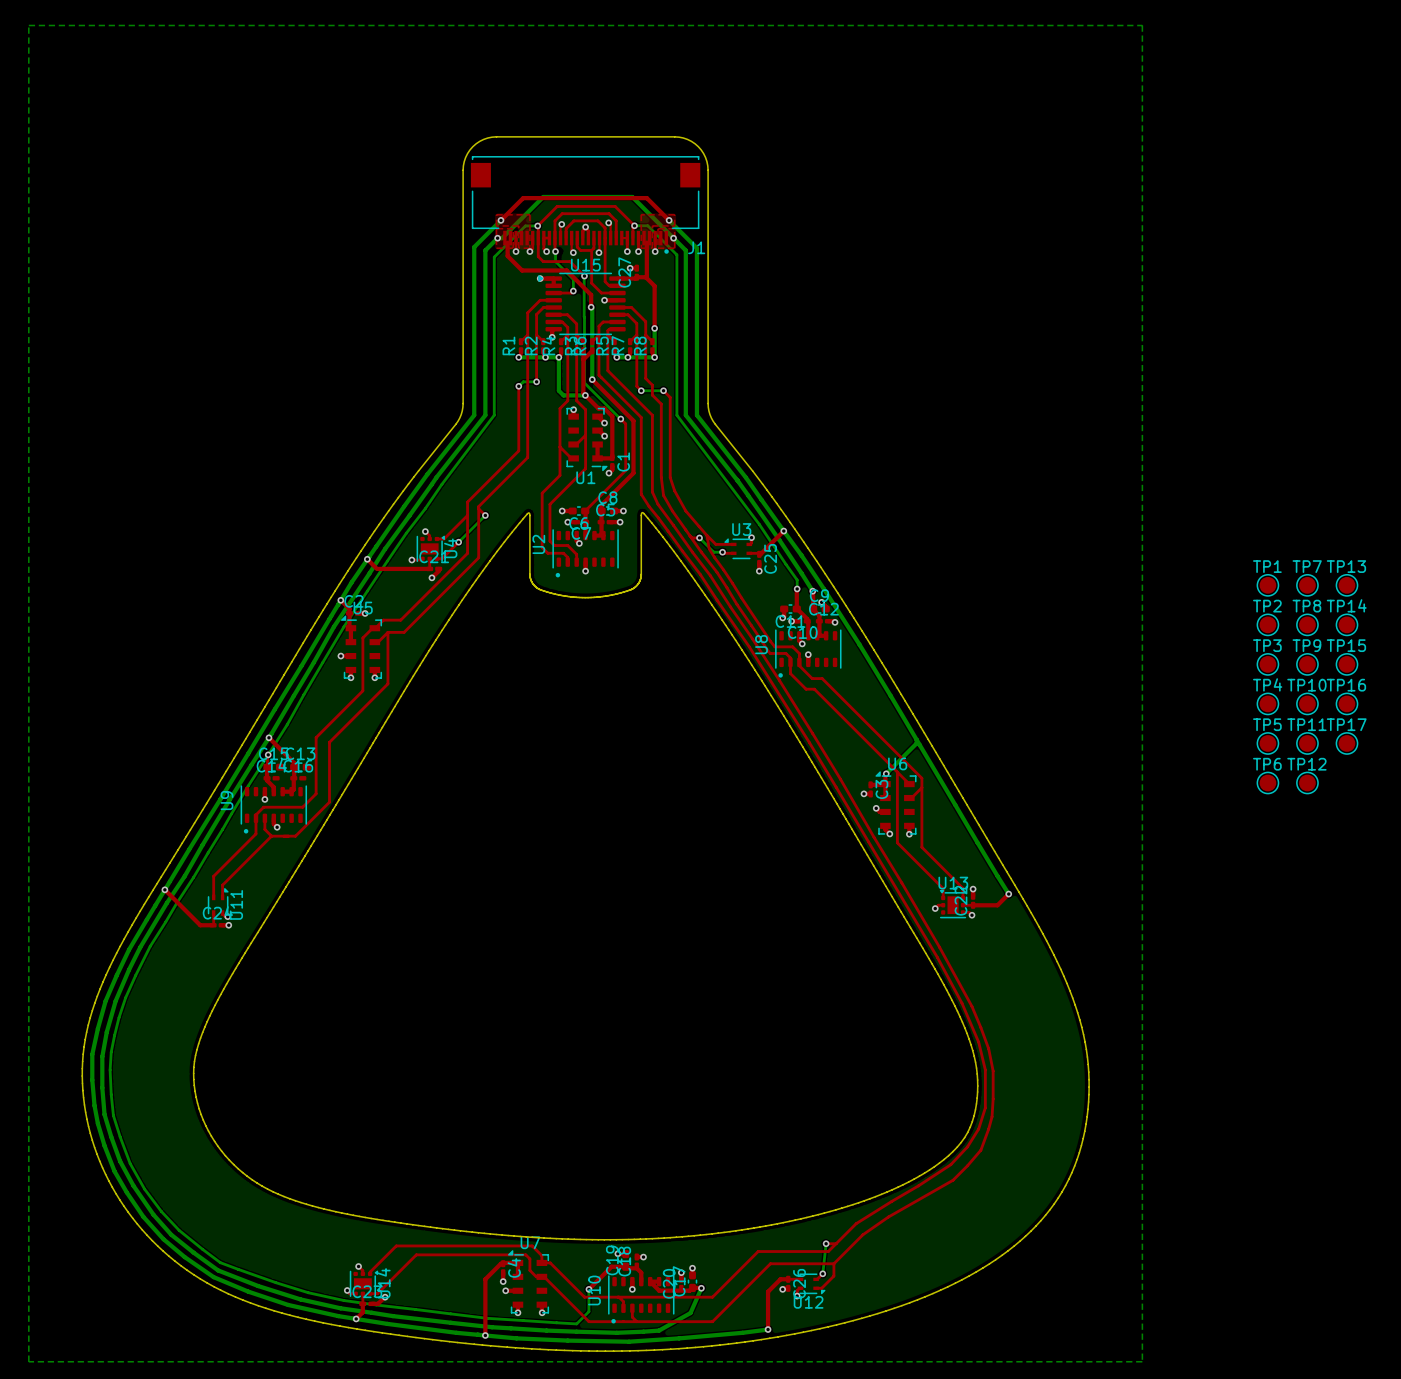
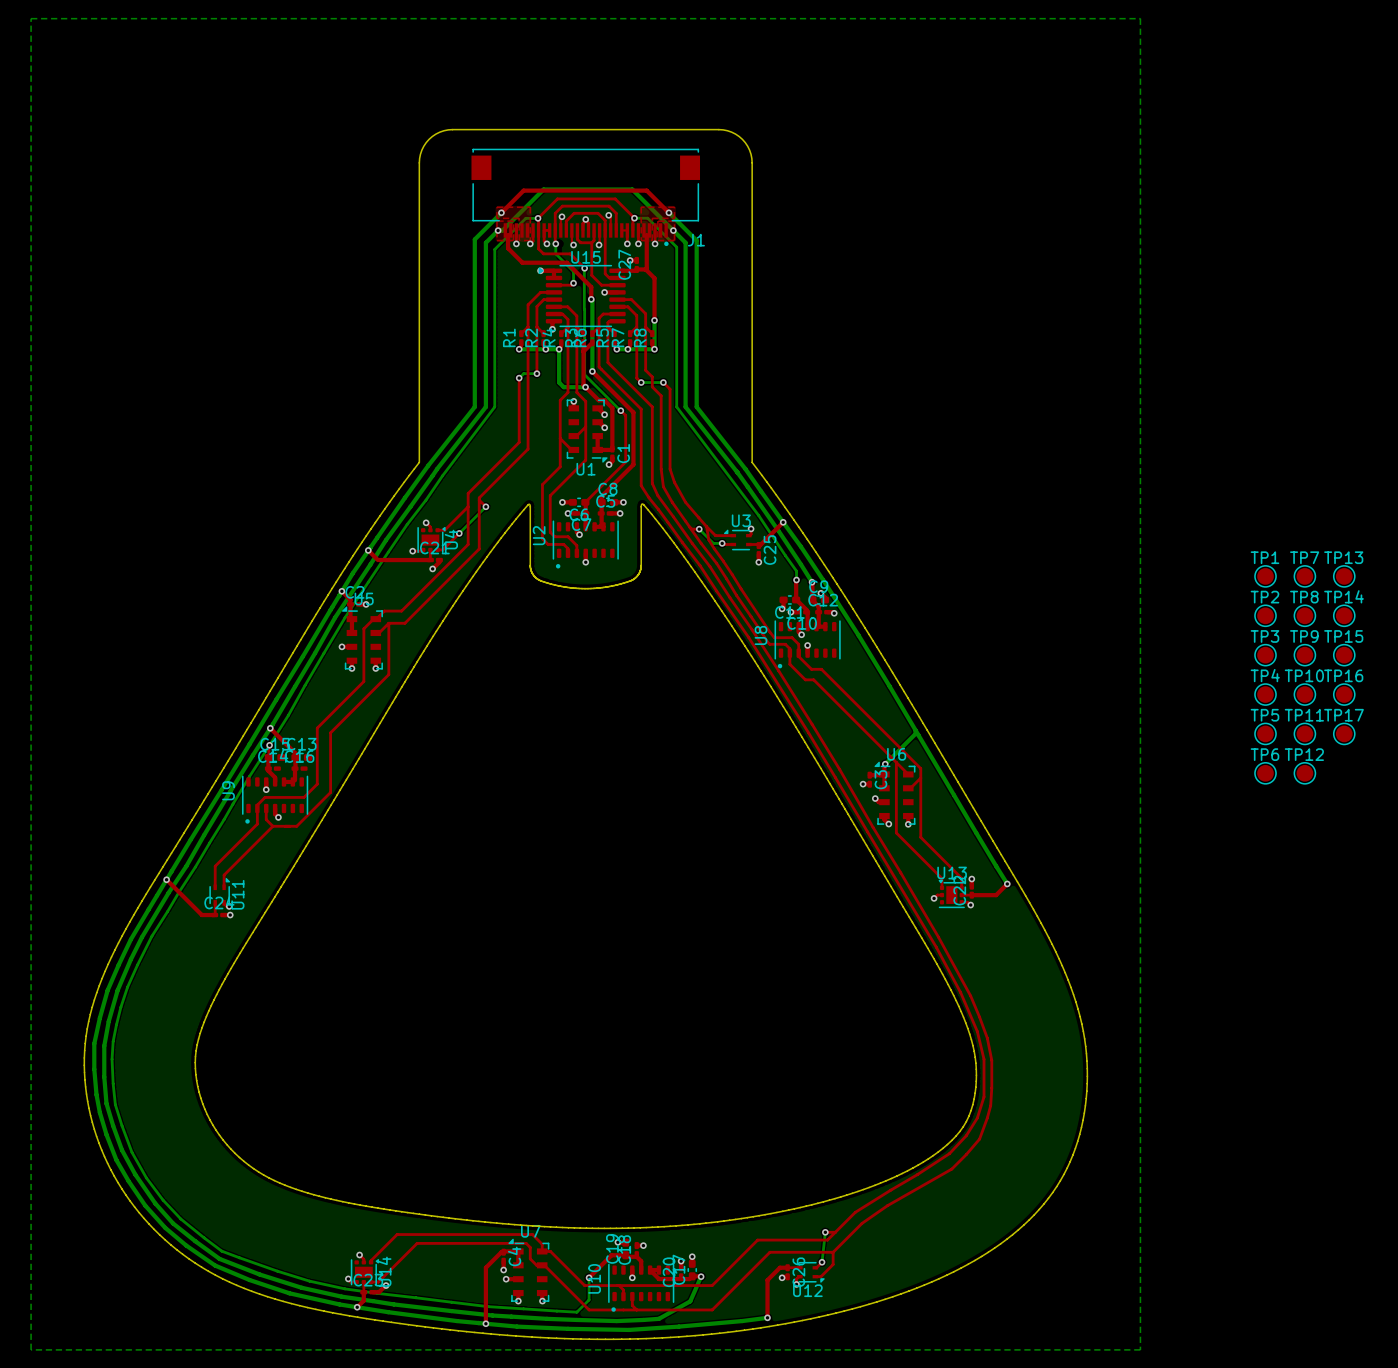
board edge: (496, 136) (483, 139) (472, 146) (465, 157) (463, 165) (462, 410) (455, 424) (418, 470) -> (496, 129) (444, 130) (429, 139) (420, 154) (419, 462)
board edge: (674, 136) (683, 138) (695, 143) (703, 153) (707, 165) (708, 410) (715, 424) (752, 470) -> (674, 129) (727, 130) (742, 139) (751, 154) (752, 462)

